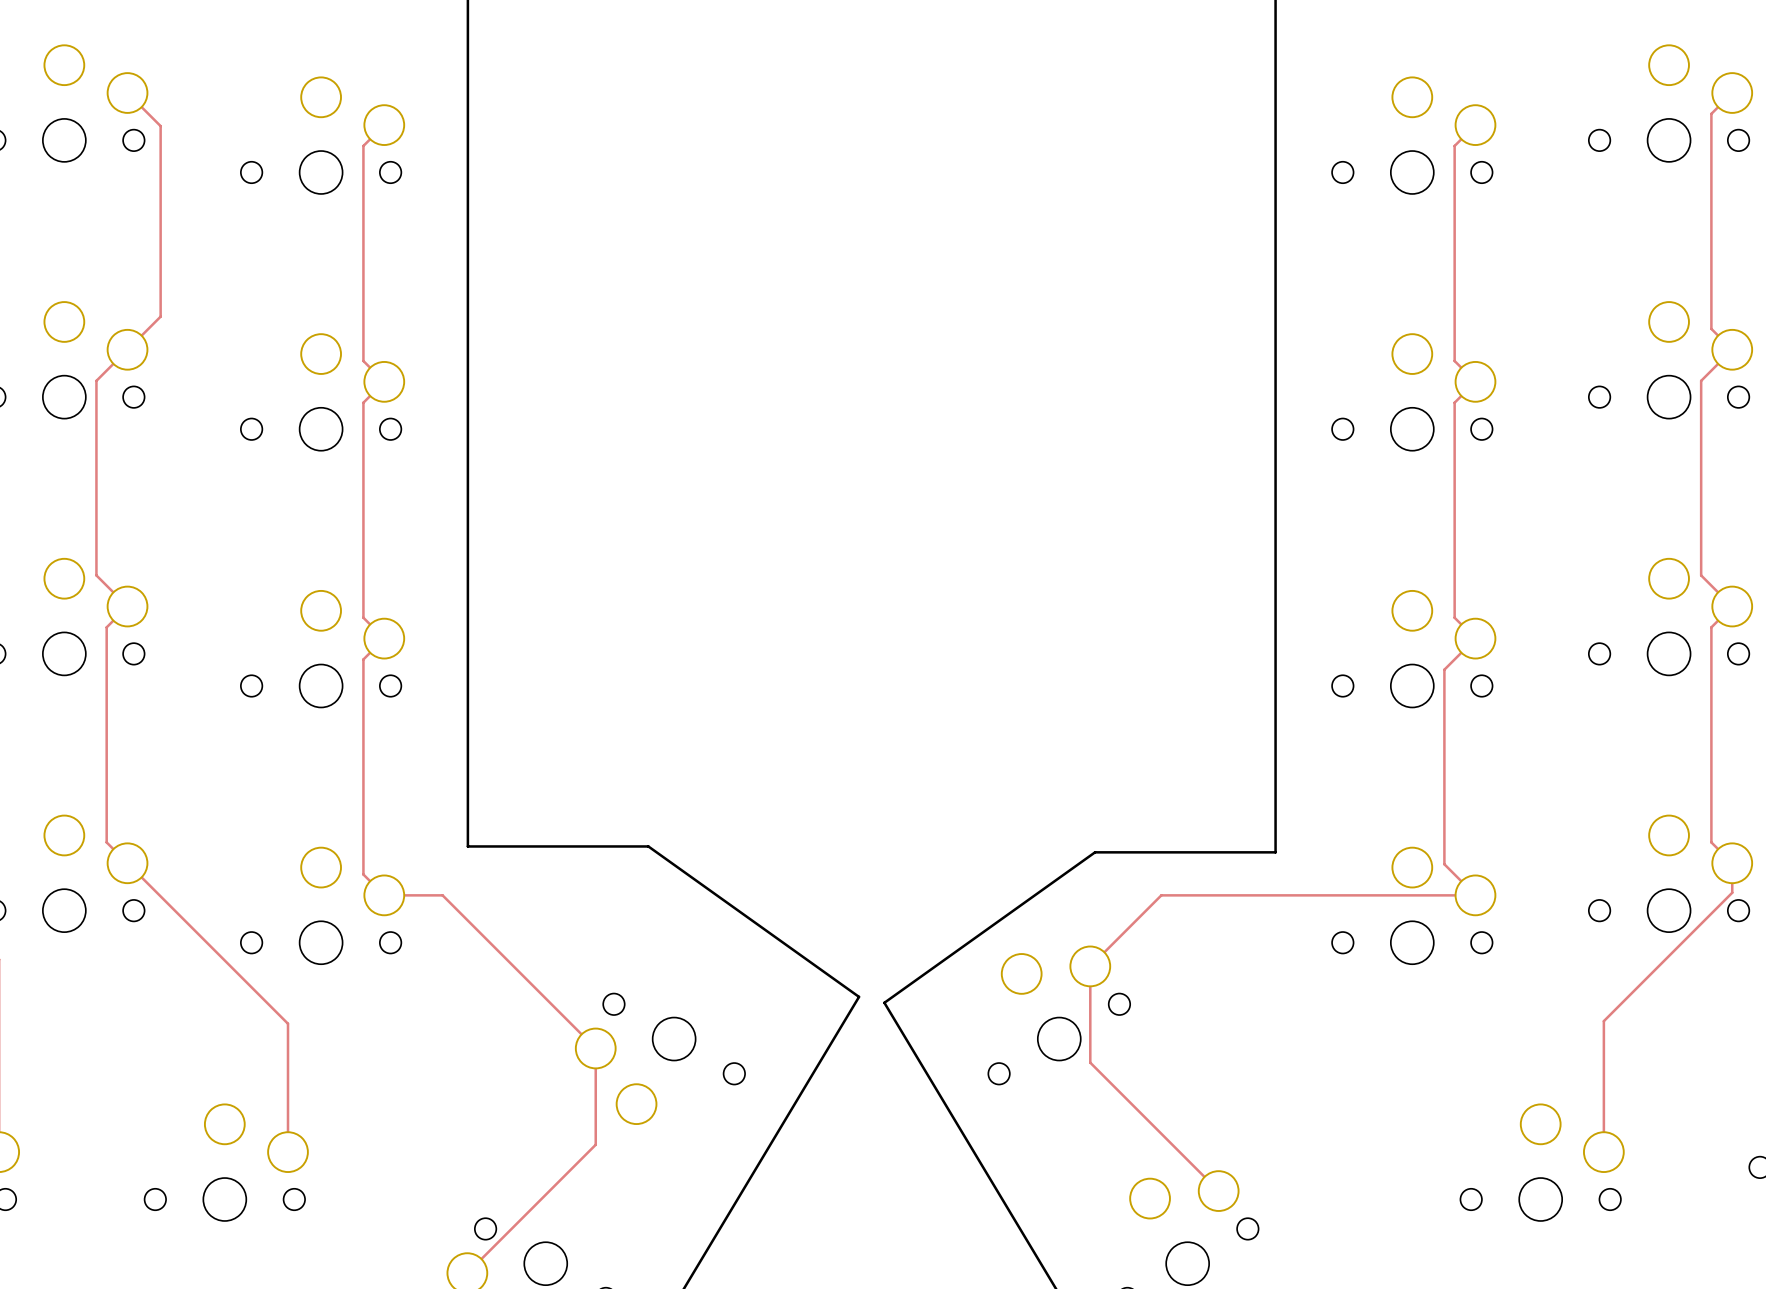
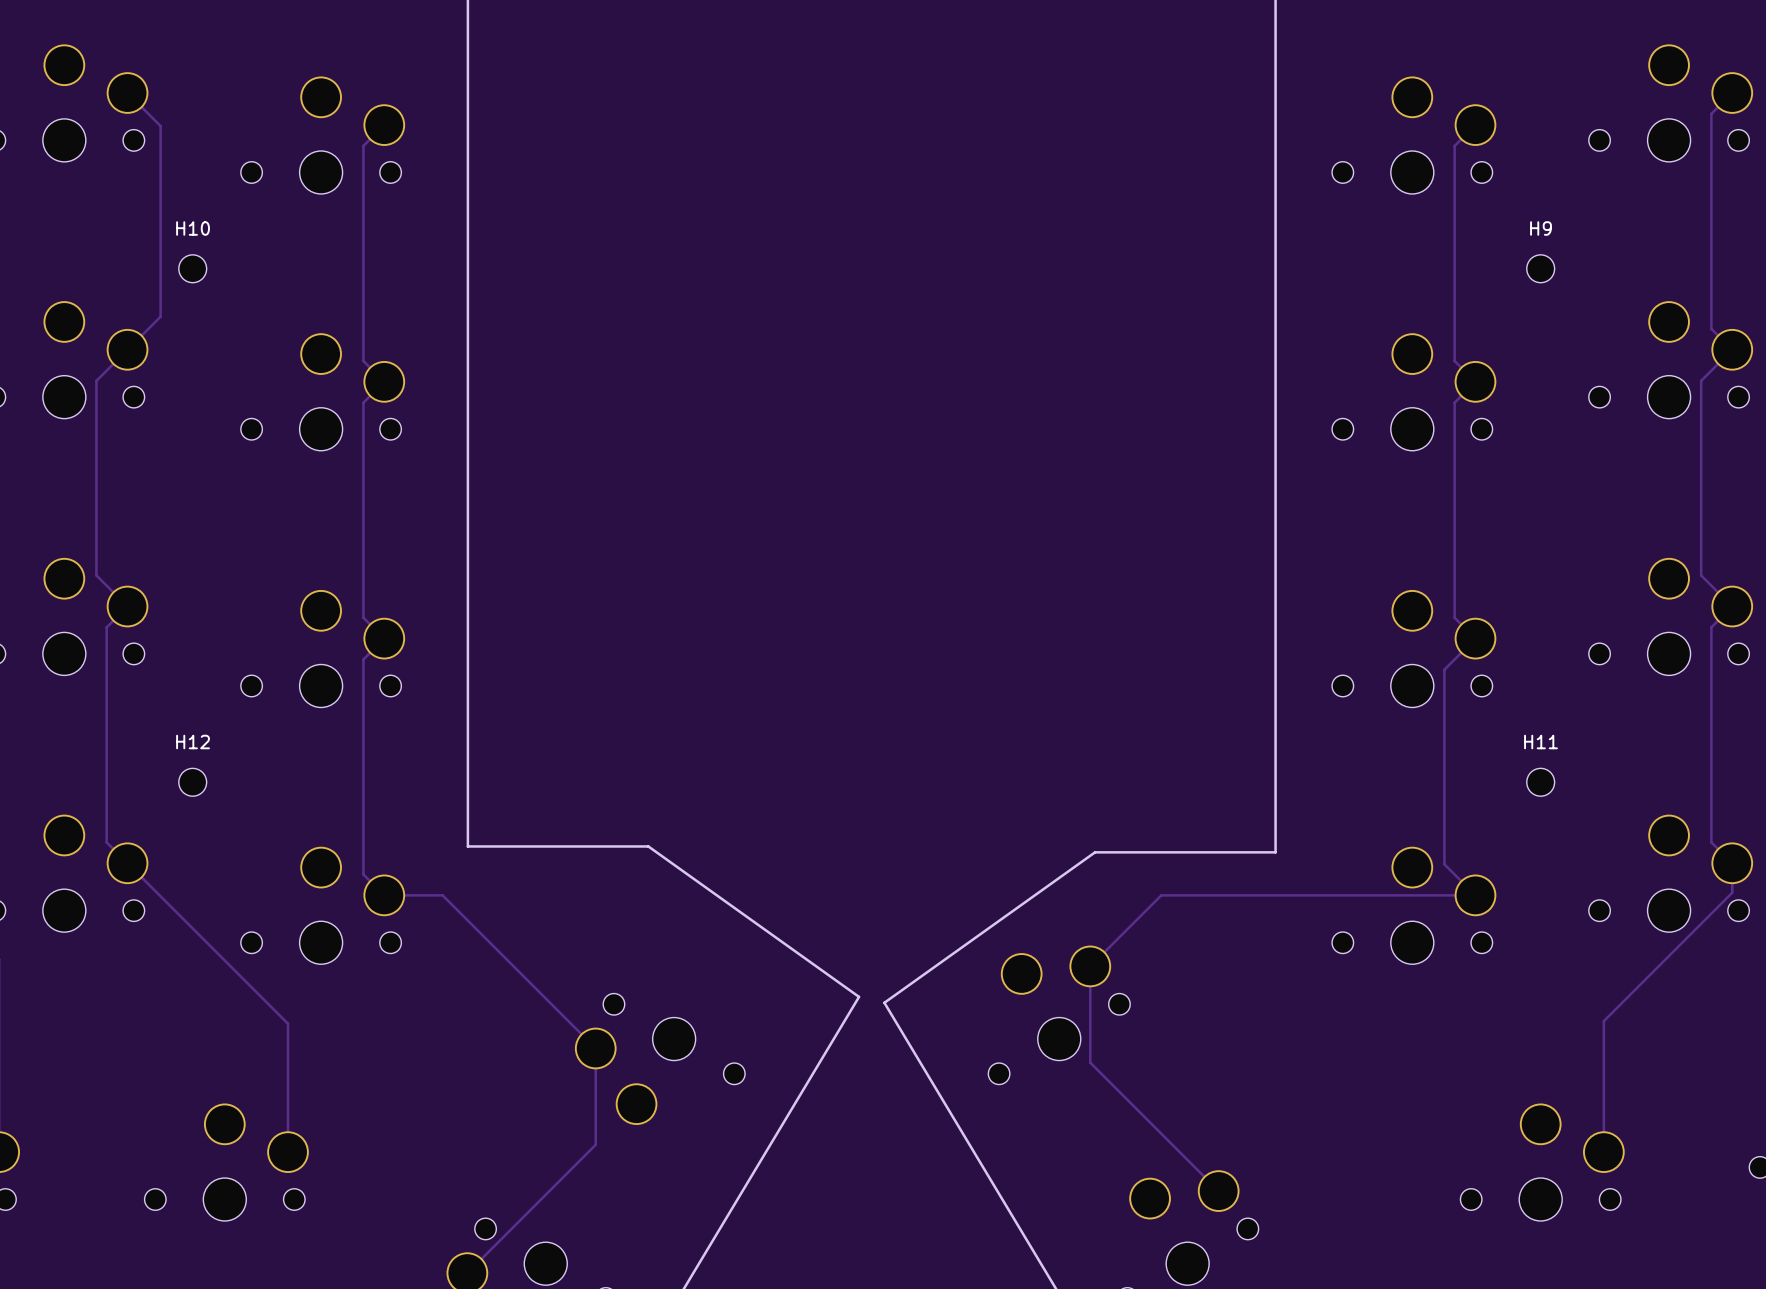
H10: none -> (192, 268)
H9: none -> (1540, 268)
H12: none -> (192, 782)
H11: none -> (1540, 782)

